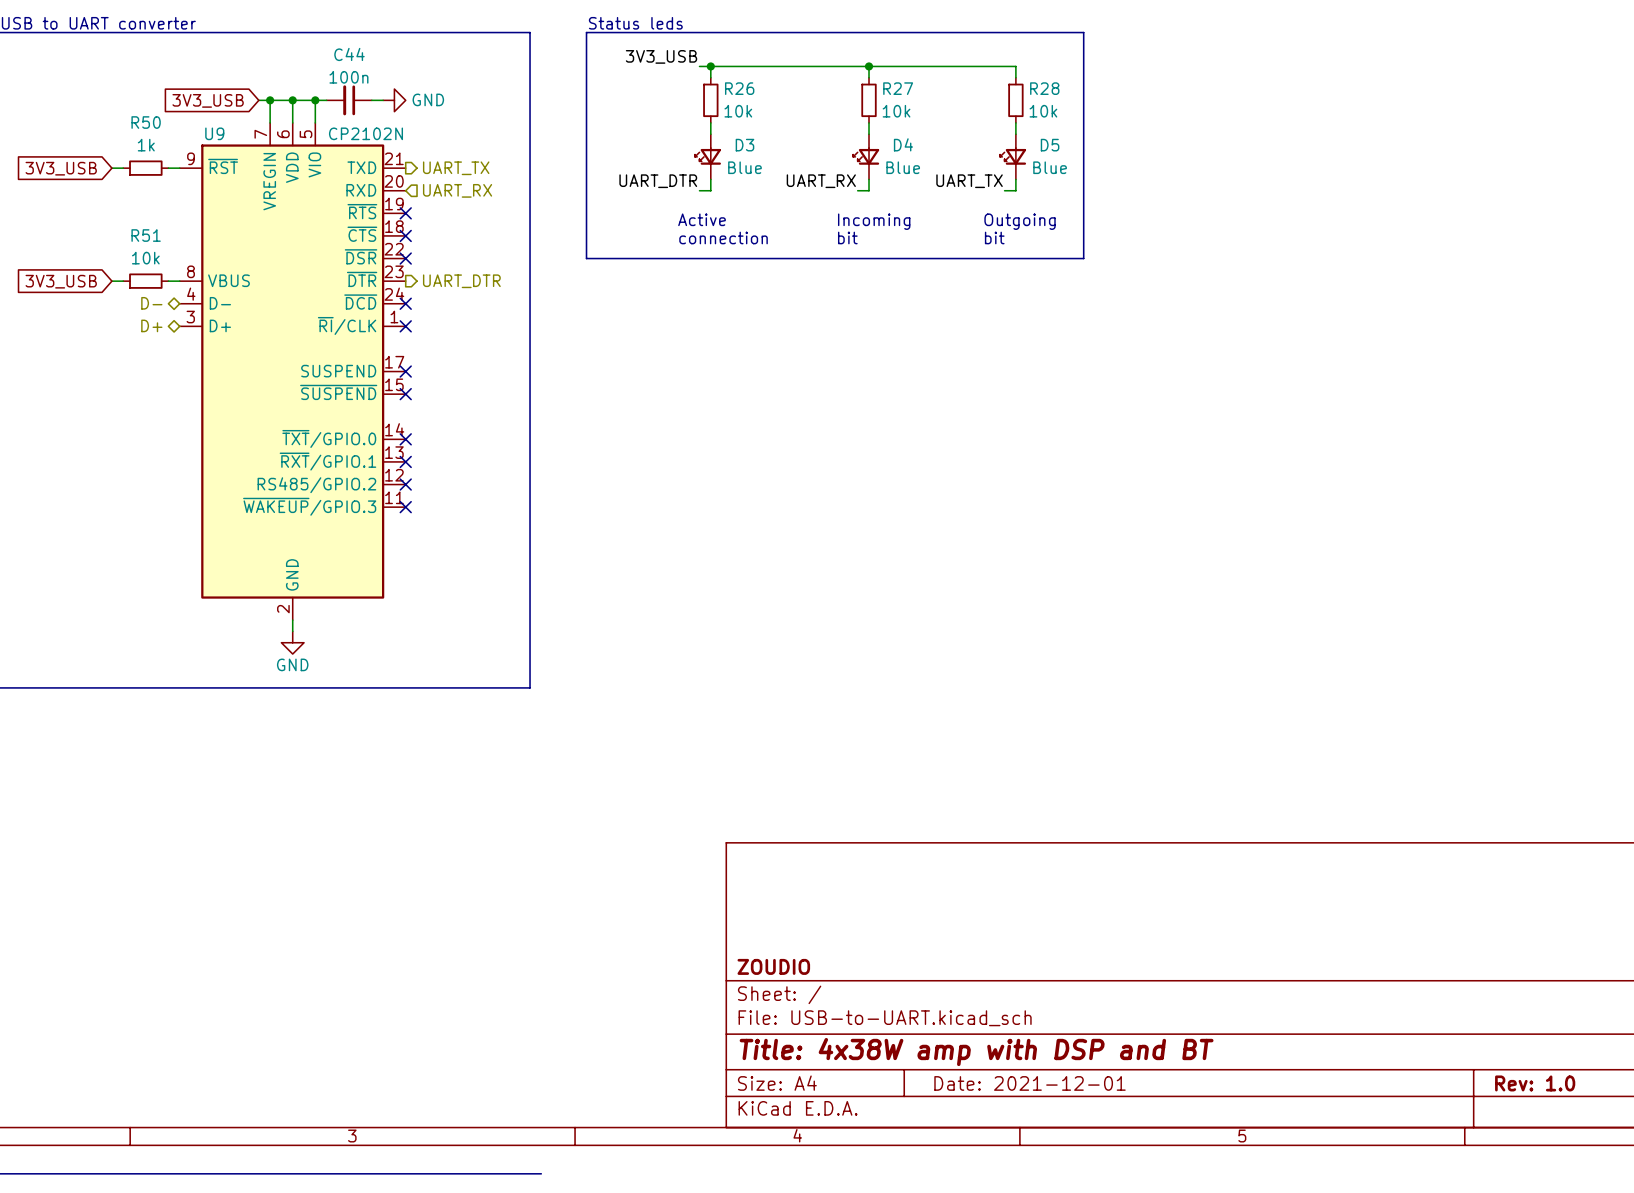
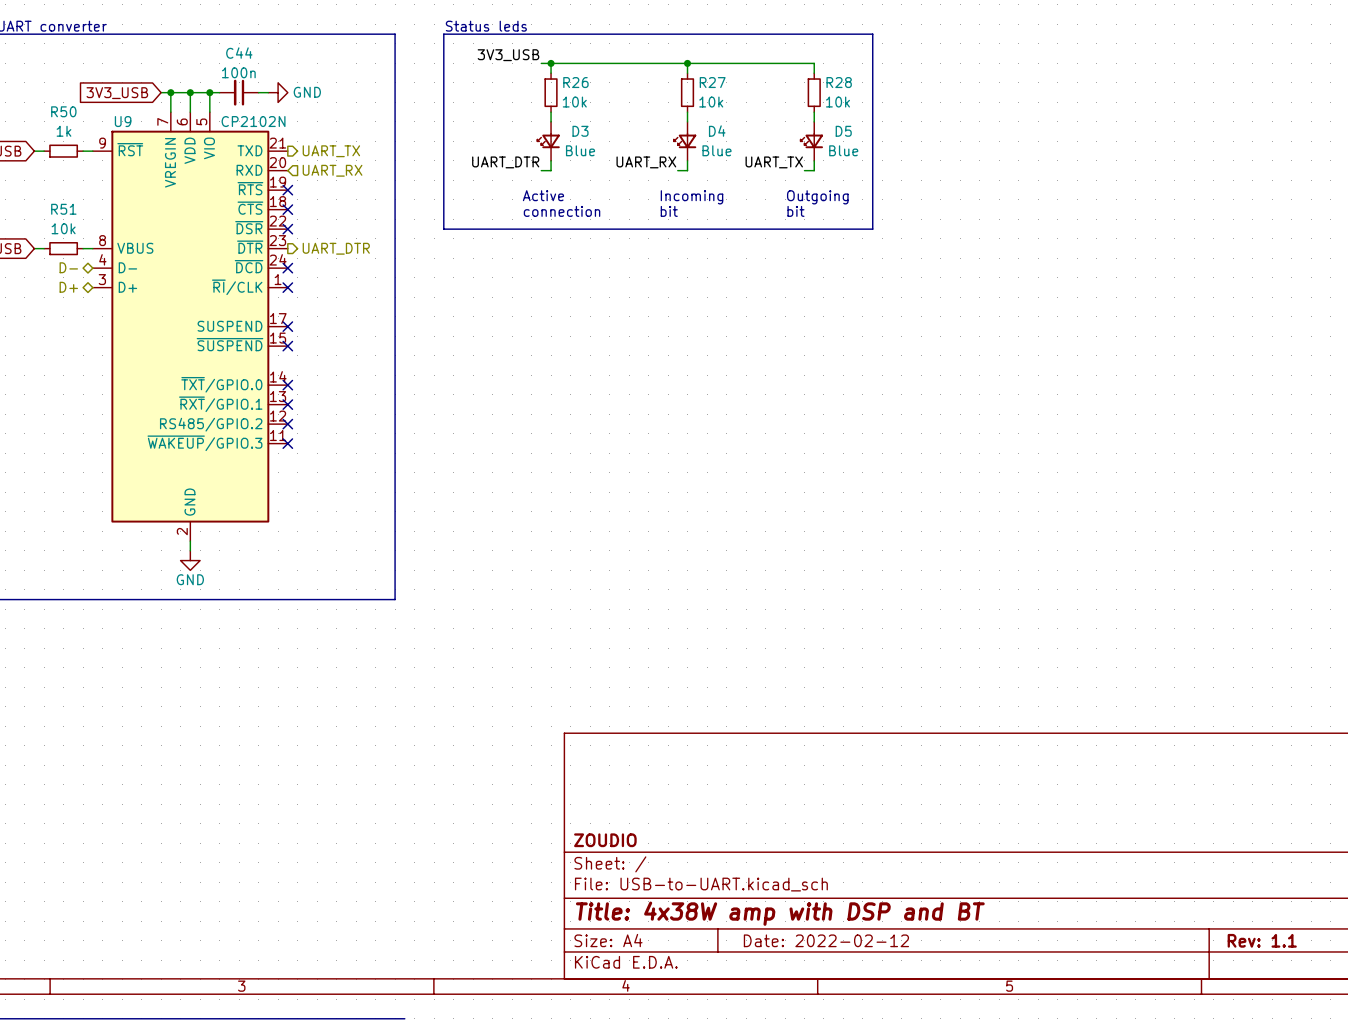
title block: Date: 2021-12-01 (1030, 1083) -> Date: 2022-02-12 (826, 940)
title block: Rev: 1.0 (1535, 1083) -> Rev: 1.1 (1262, 940)

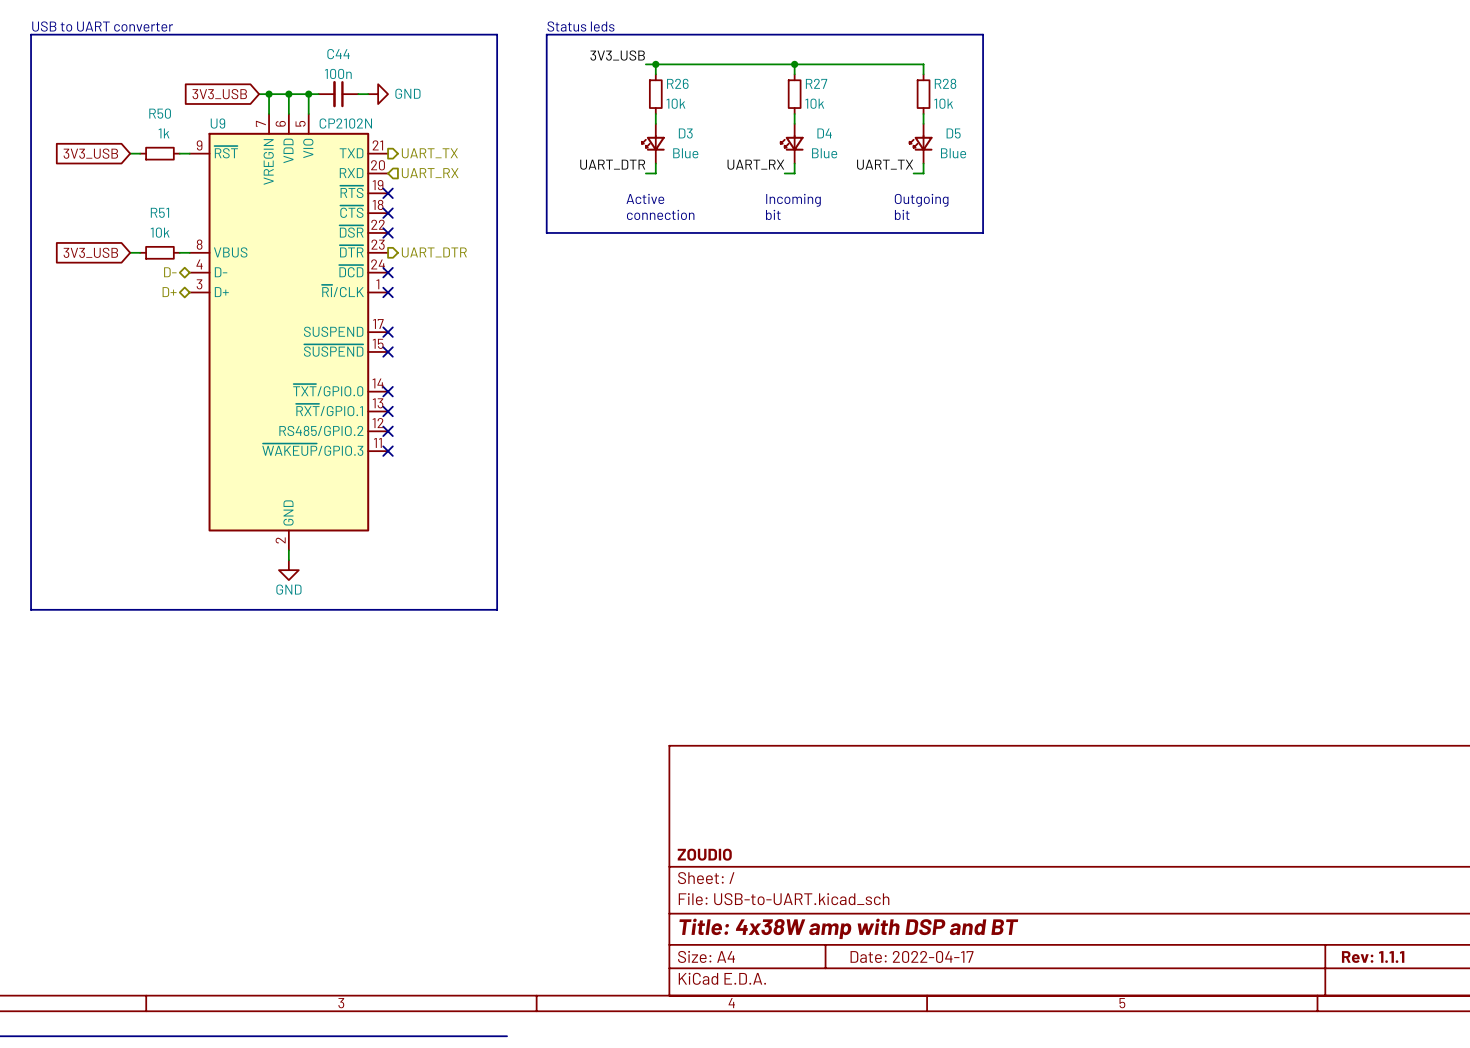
title block: Date: 2022-02-12 (826, 940) -> Date: 2022-04-17 (912, 956)
title block: Rev: 1.1 (1262, 940) -> Rev: 1.1.1 (1373, 957)

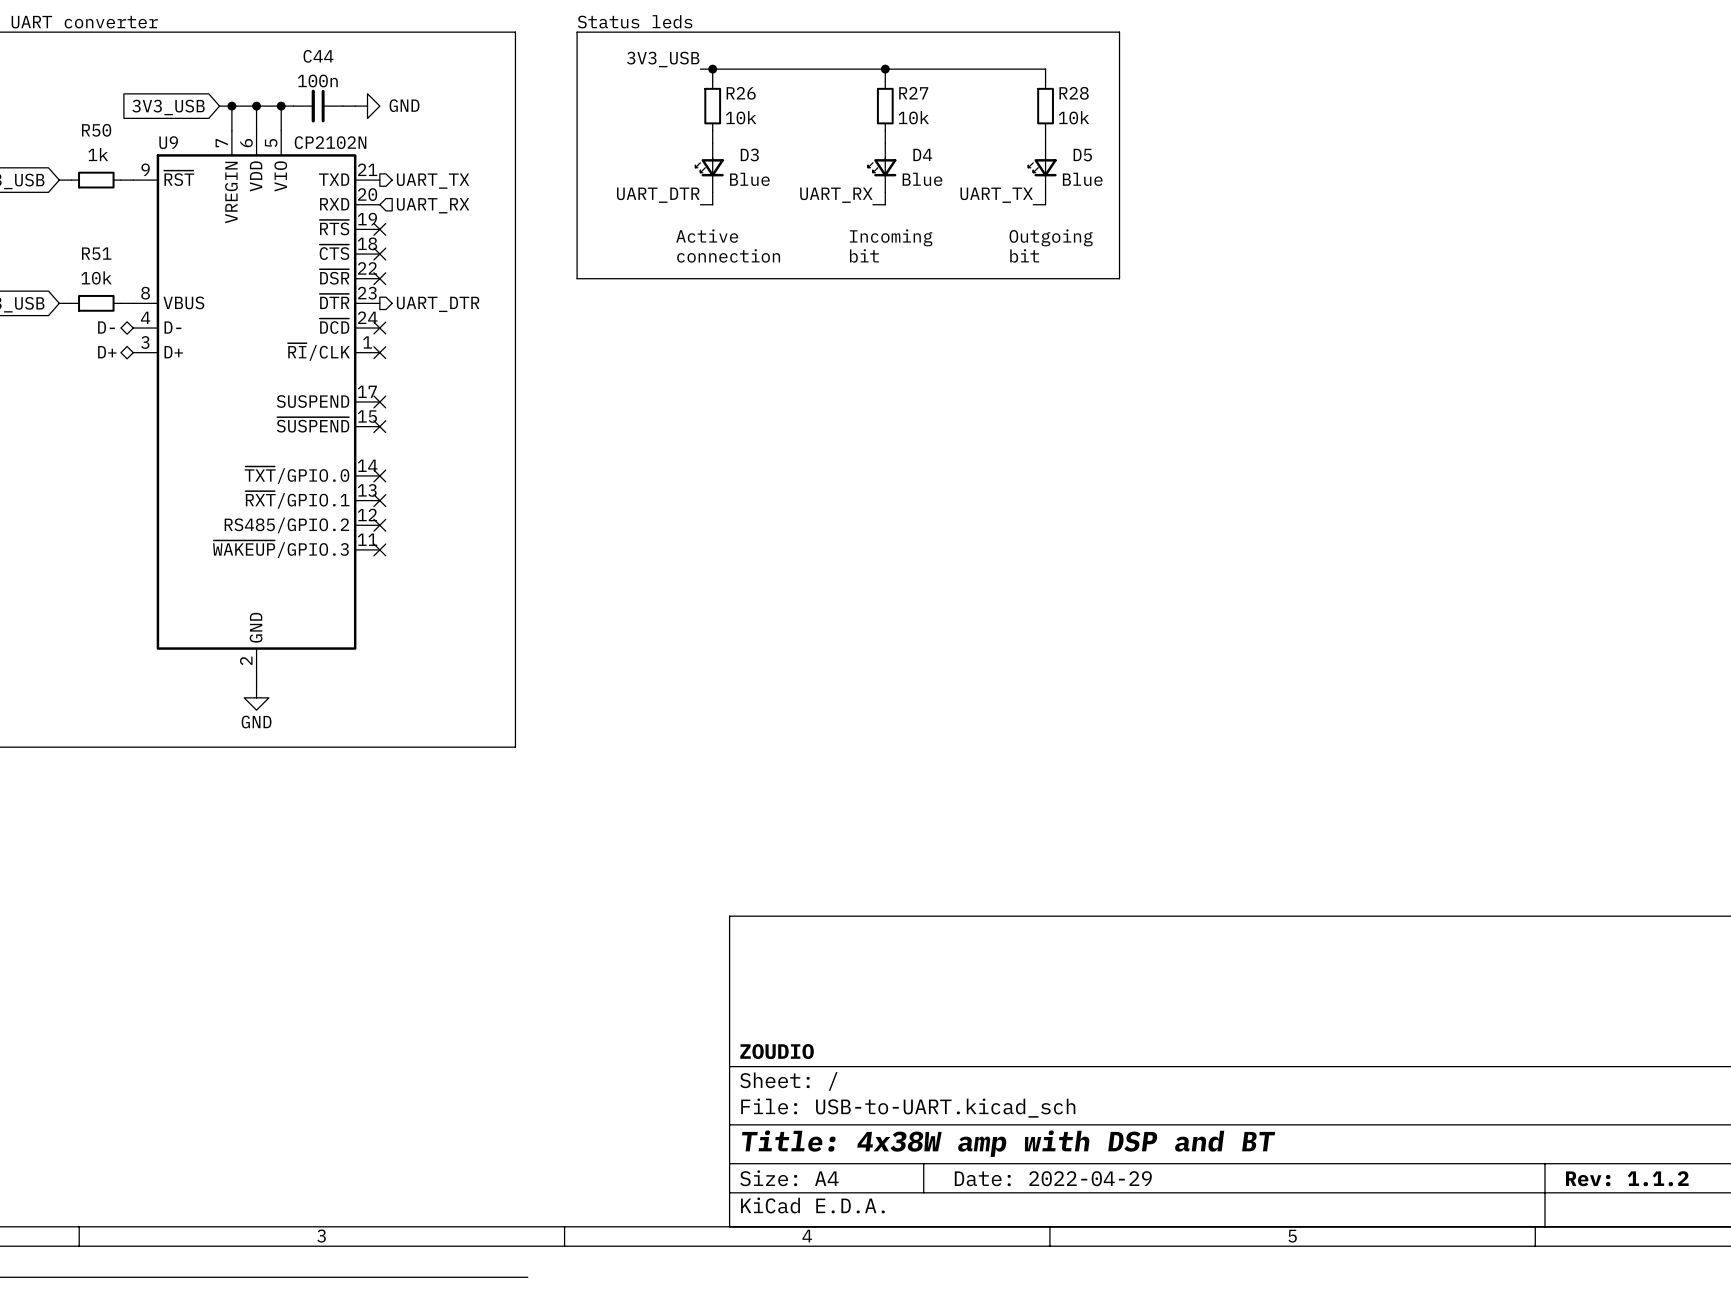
title block: Date: 2022-04-17 (912, 956) -> Date: 2022-04-29 (1053, 1178)
title block: Rev: 1.1.1 (1373, 957) -> Rev: 1.1.2 (1627, 1178)

